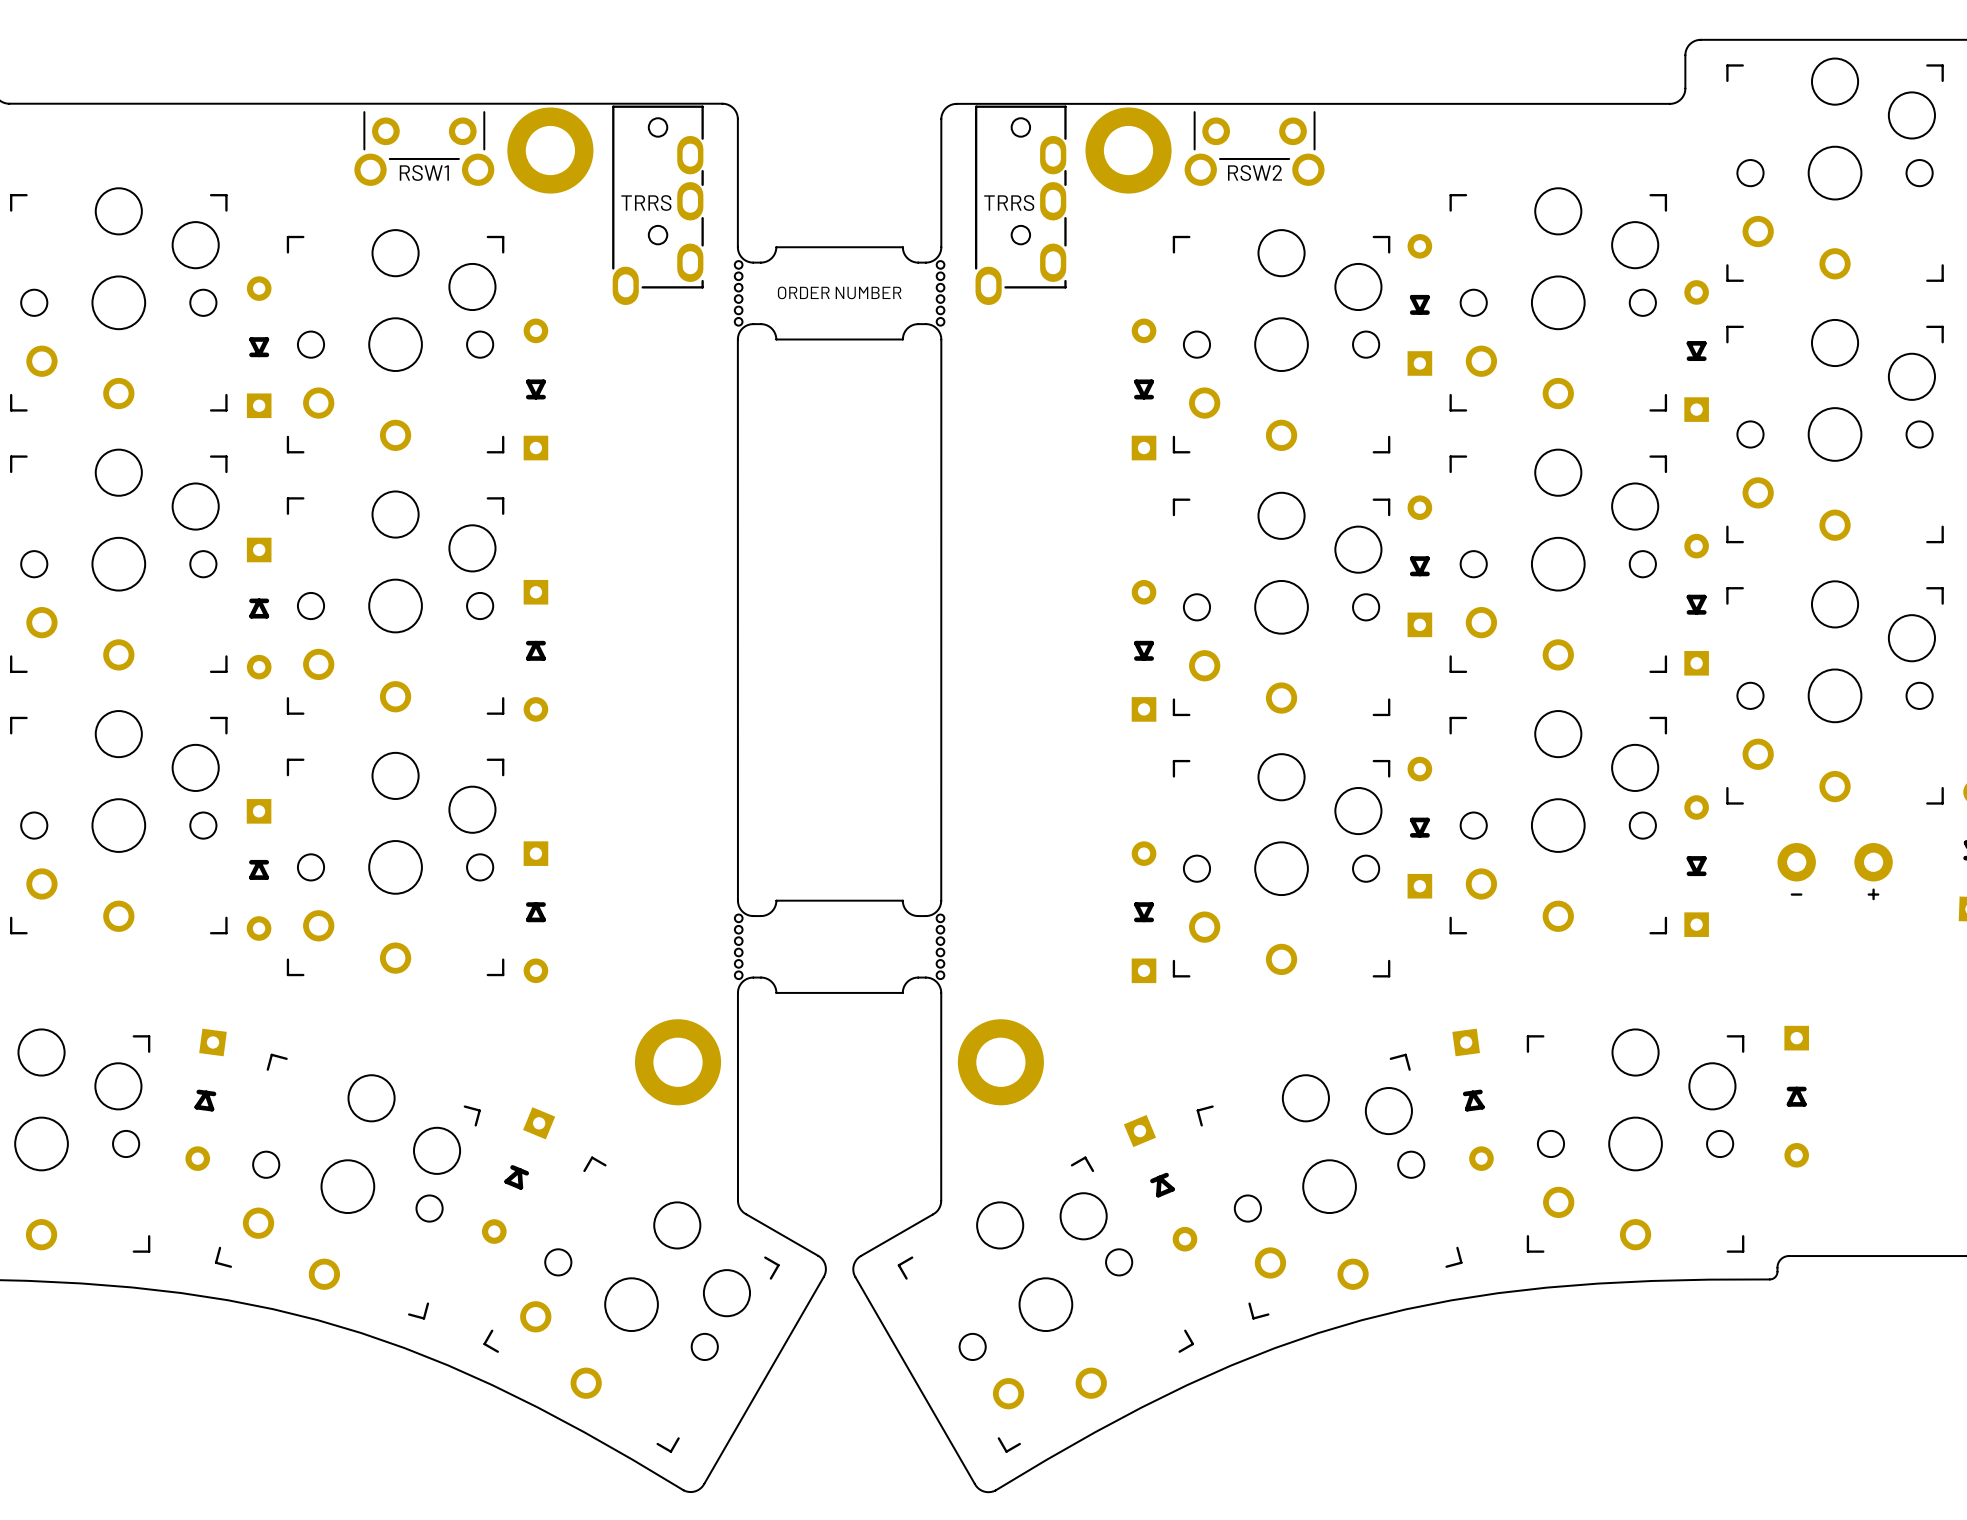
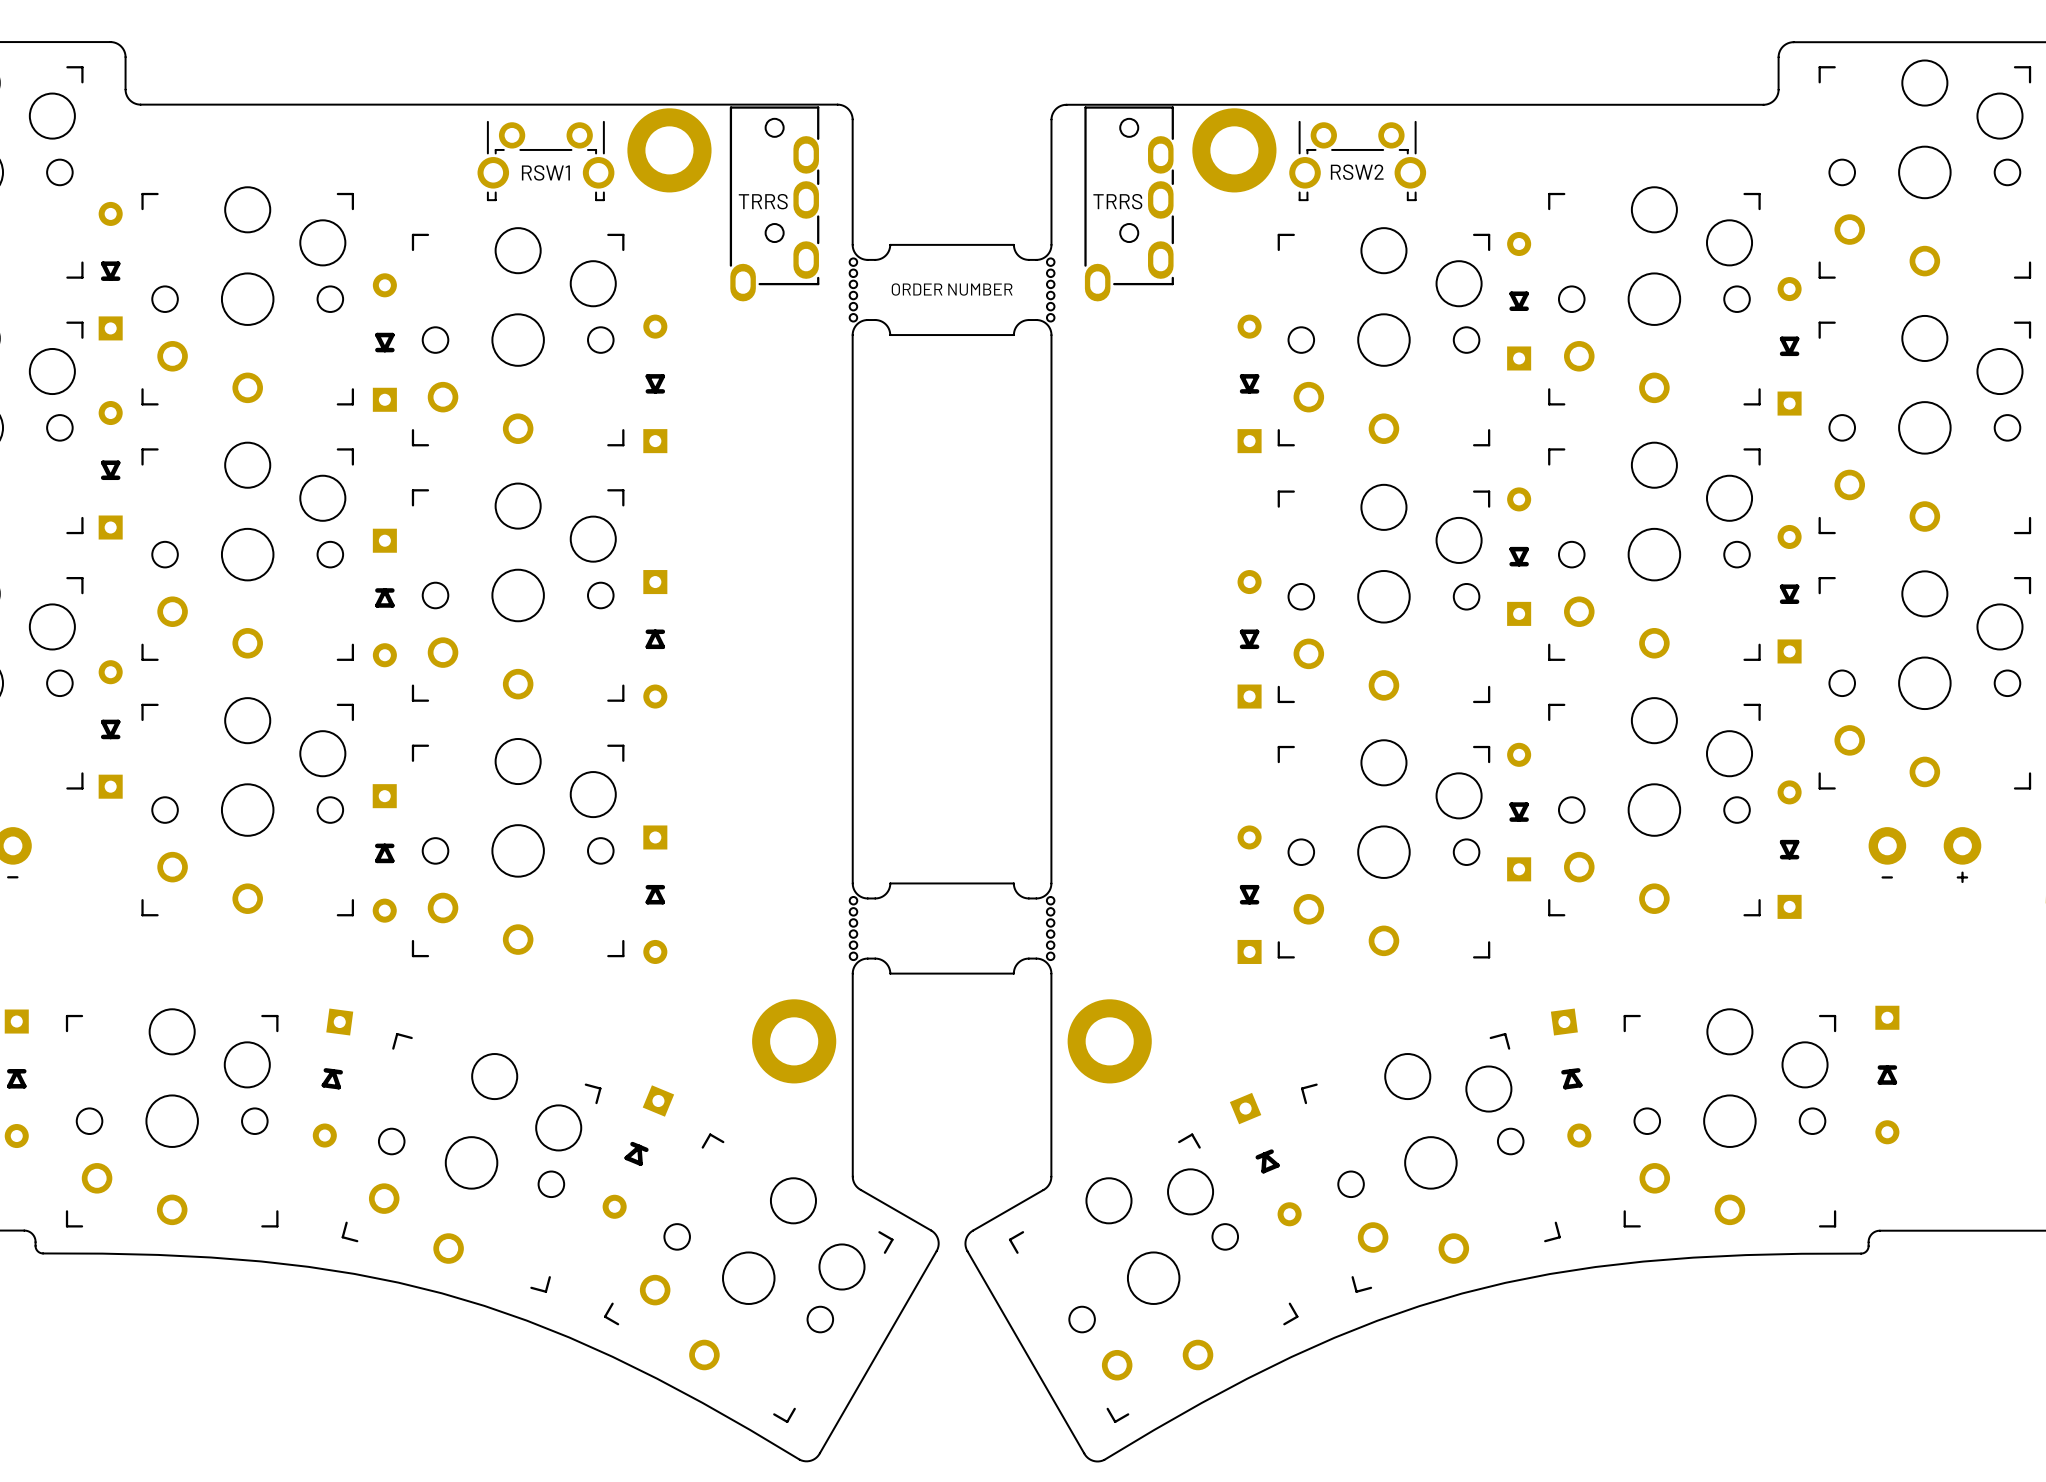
RSW1 footprint: [354, 111, 495, 186] -> [477, 120, 615, 202]
RSW2 footprint: [1184, 111, 1325, 186] -> [1289, 120, 1427, 202]

